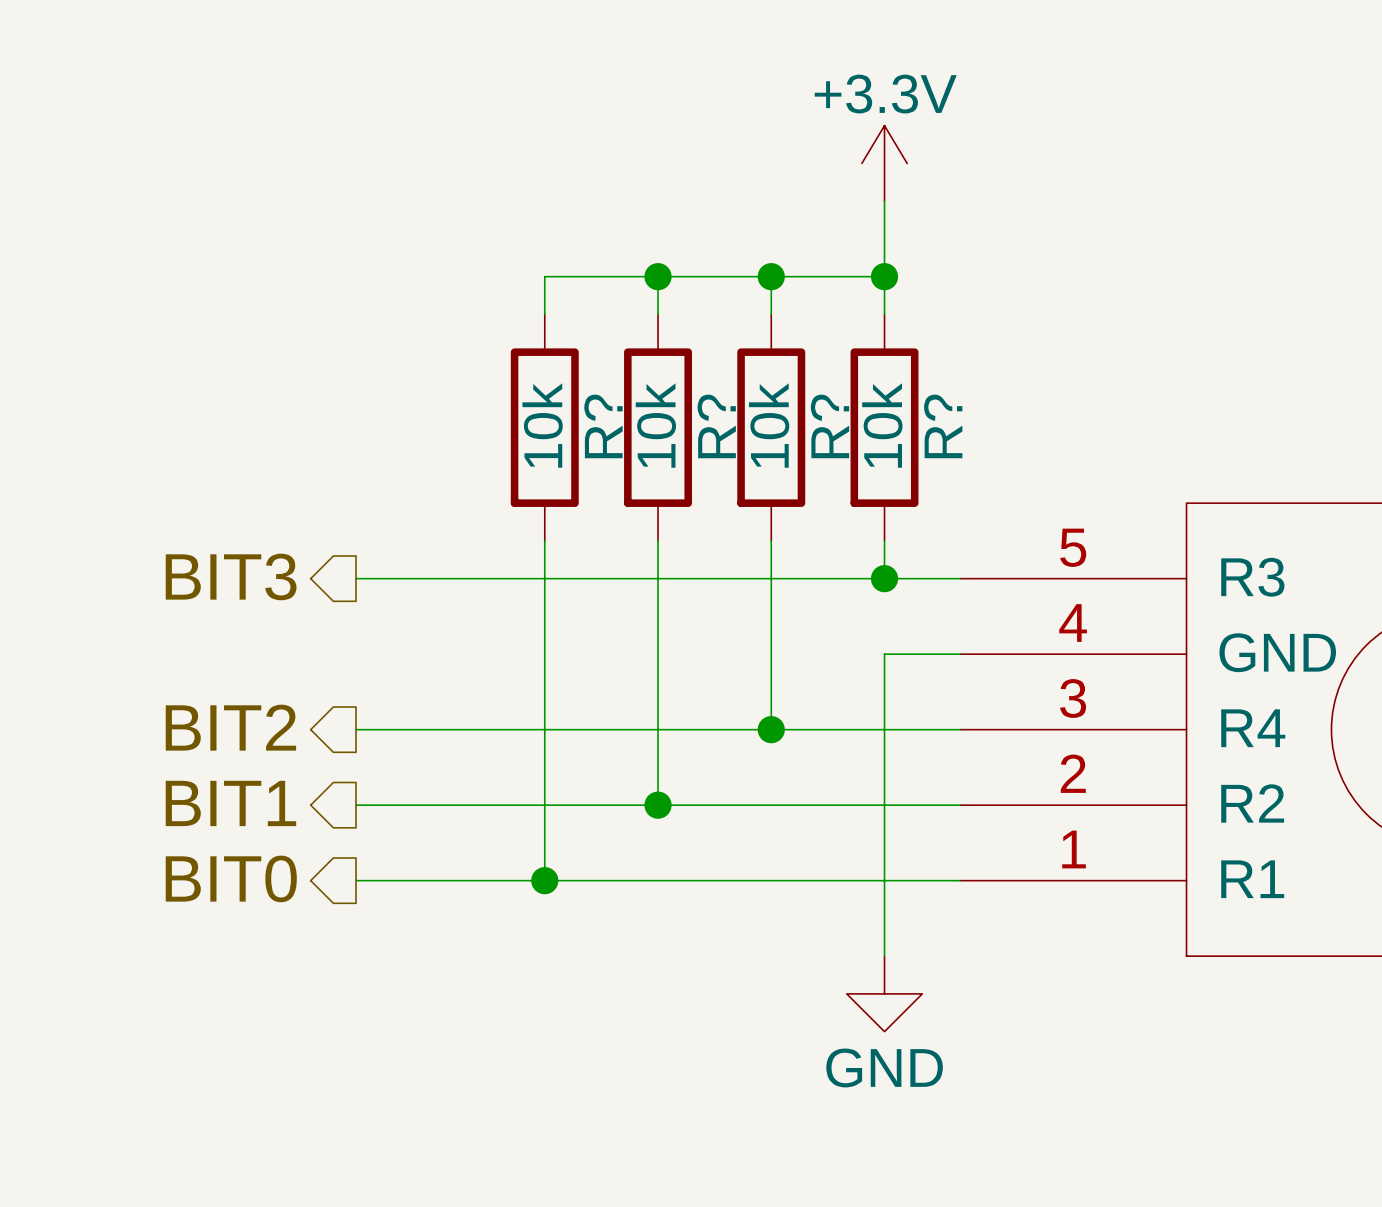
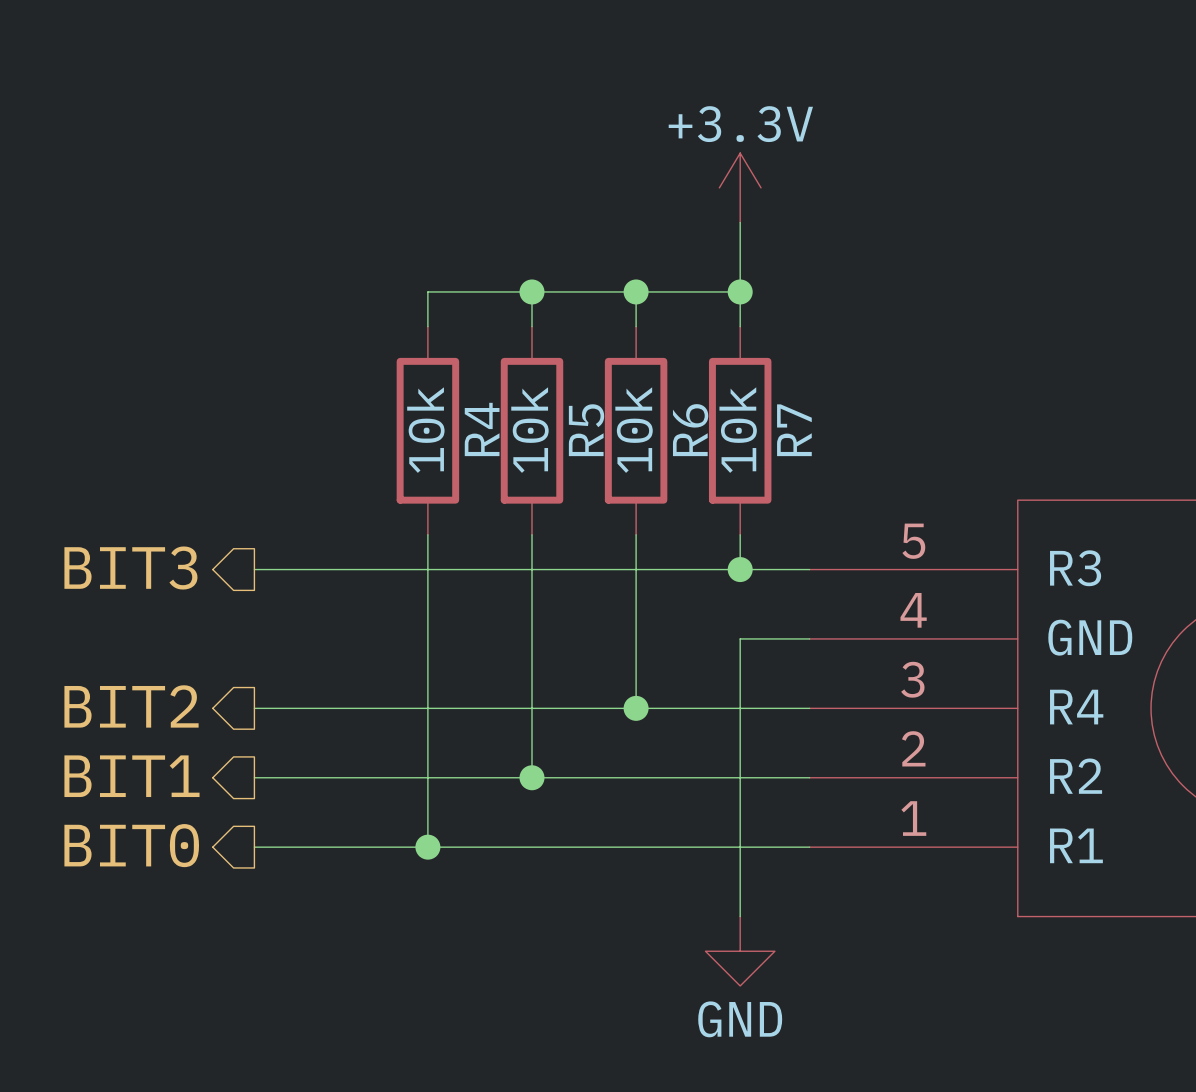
R? name: R? (603, 426) -> R4 (482, 429)
R? name: R? (716, 426) -> R5 (586, 430)
R? name: R? (829, 426) -> R6 (690, 430)
R? name: R? (943, 426) -> R7 (794, 430)

